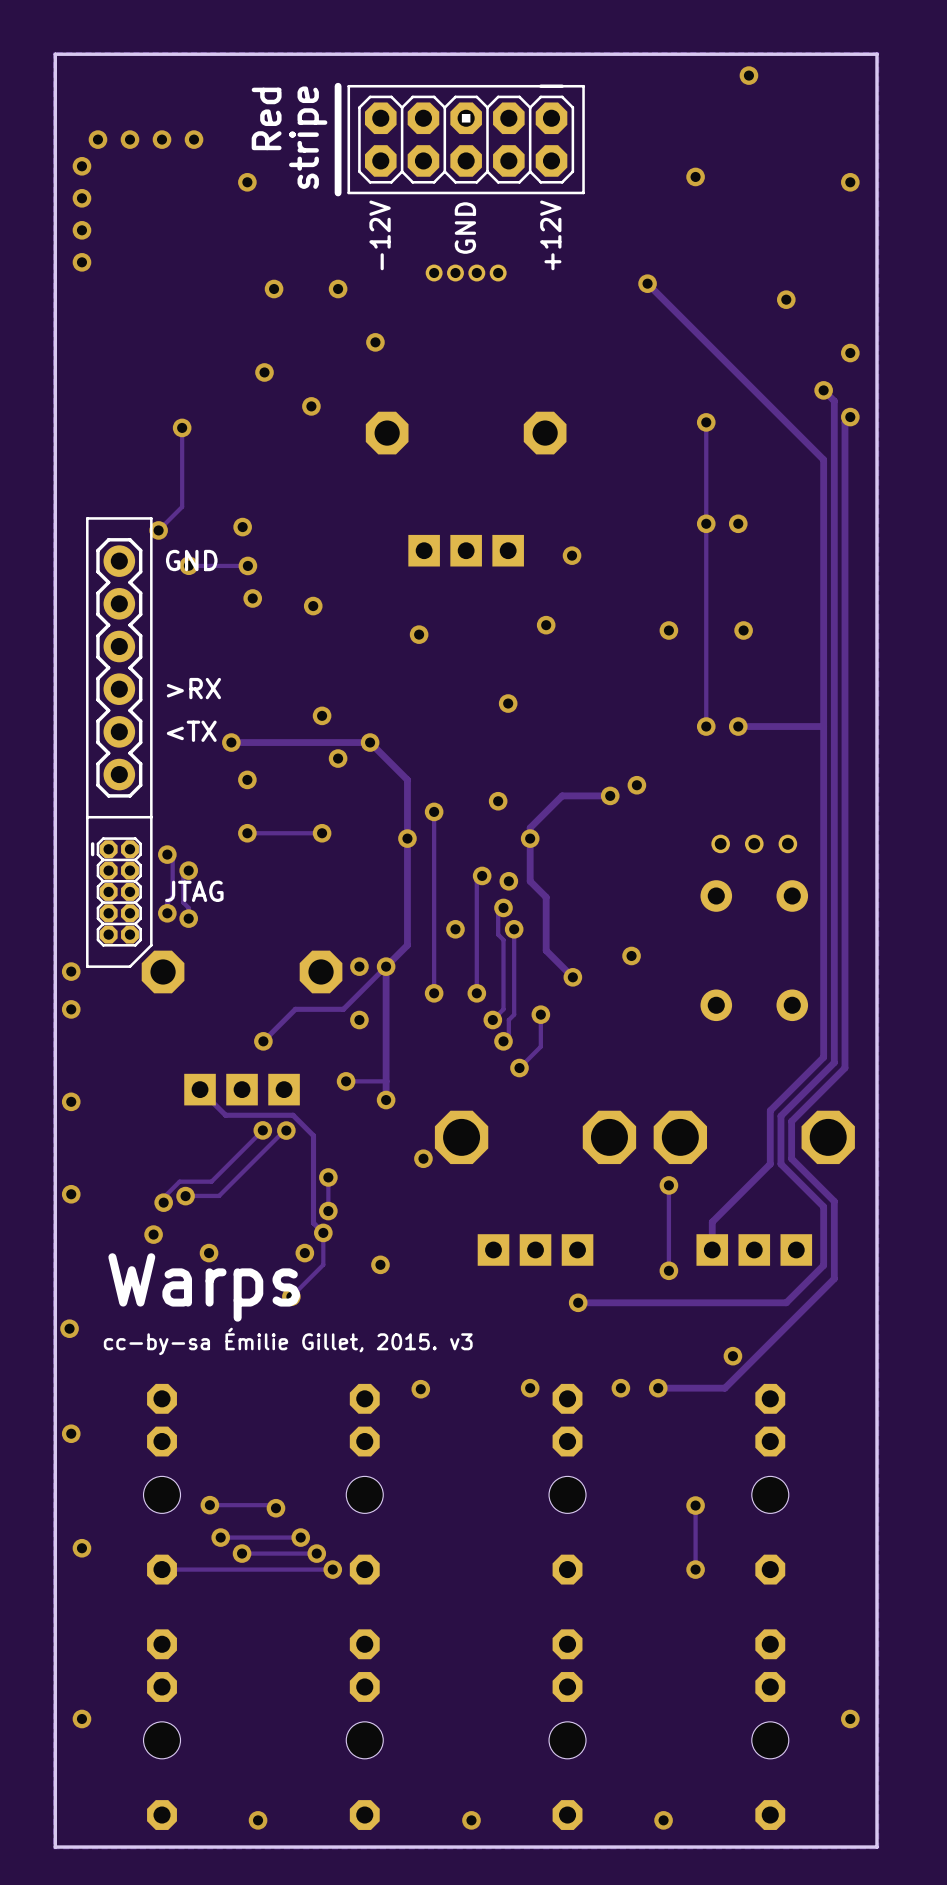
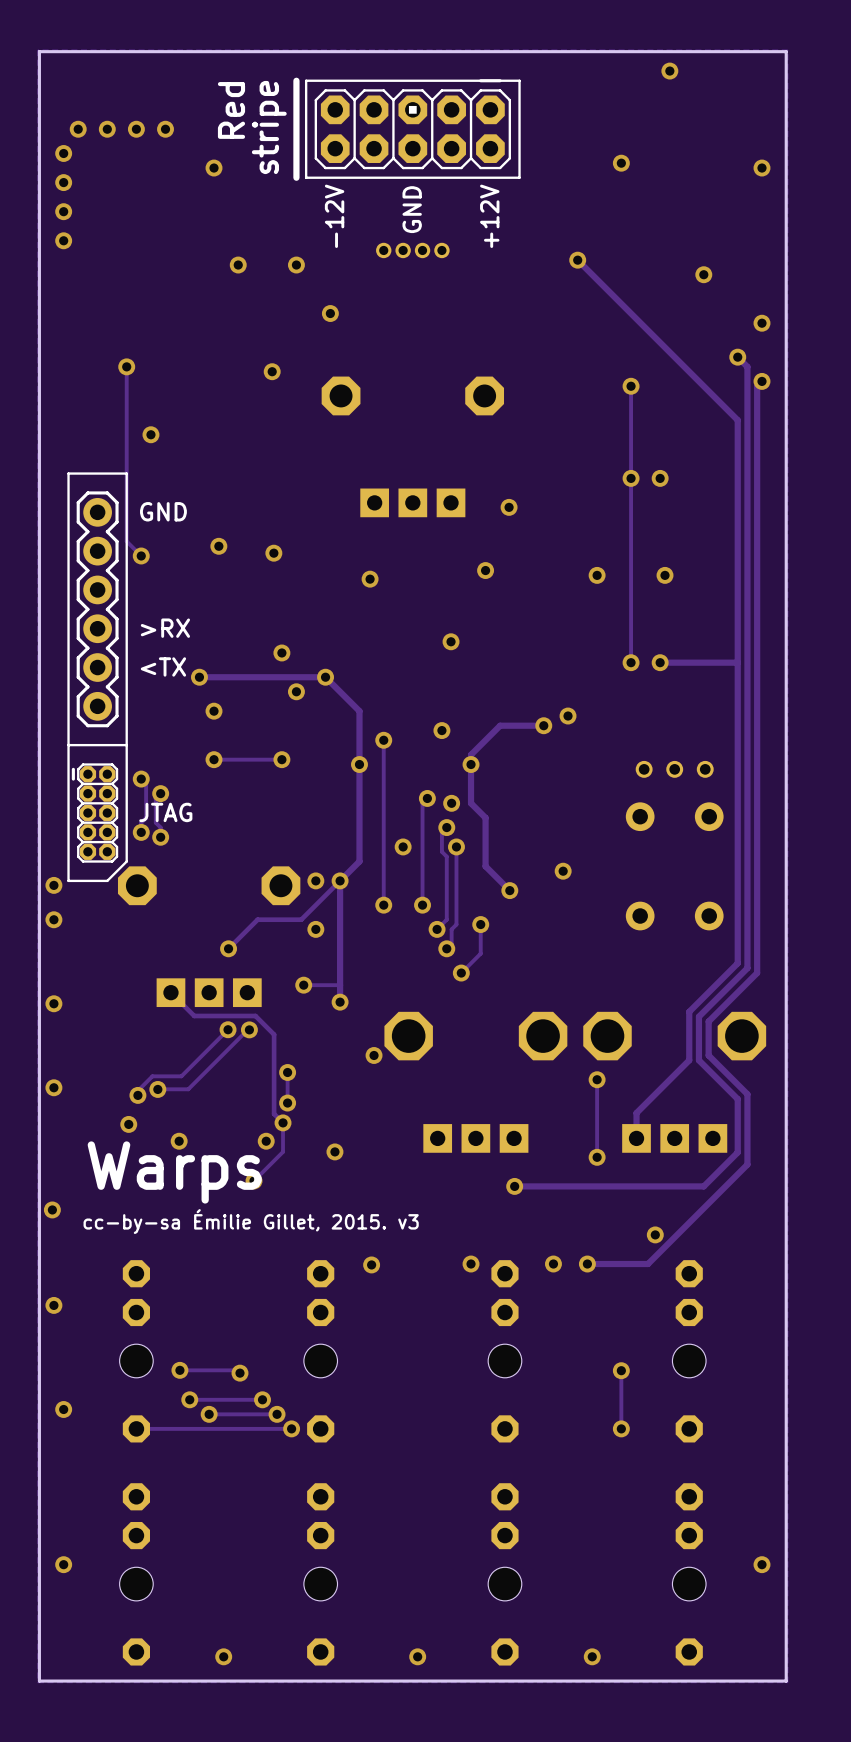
via: (264, 372) -> none
track: none -> (126, 366) (126, 541) (141, 555)
via: none -> (126, 366)
track: (182, 427) (182, 506) (158, 530) -> none
via: (182, 427) -> none
via: none -> (150, 434)
via: (242, 527) -> none
via: (158, 530) -> none
via: (188, 565) -> none
track: (247, 565) (189, 565) -> none
via: (247, 565) -> none
via: none -> (141, 555)

